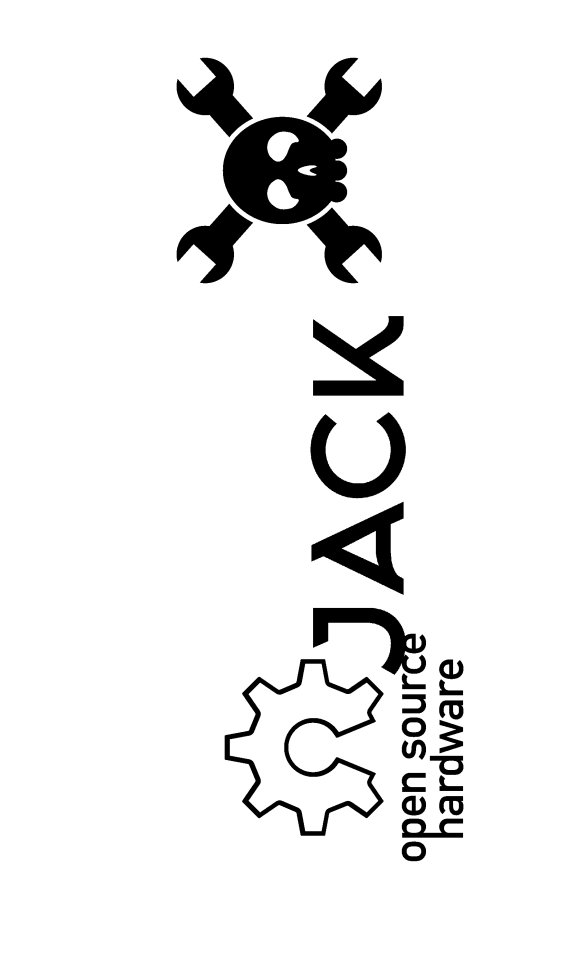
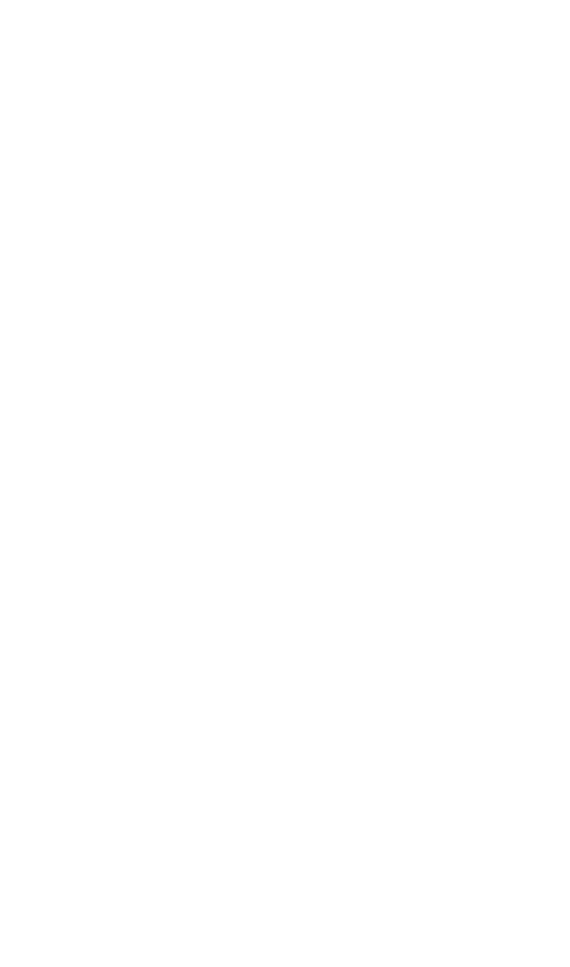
drawing: [176, 57, 464, 862] -> none

